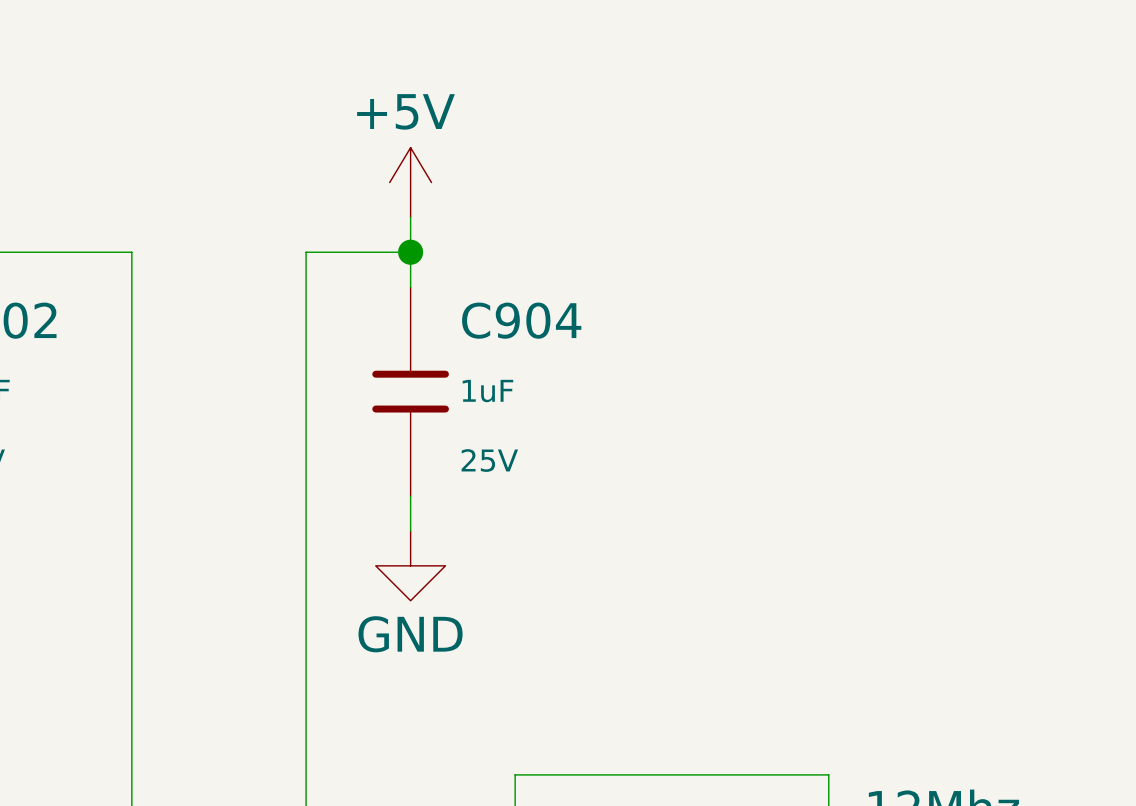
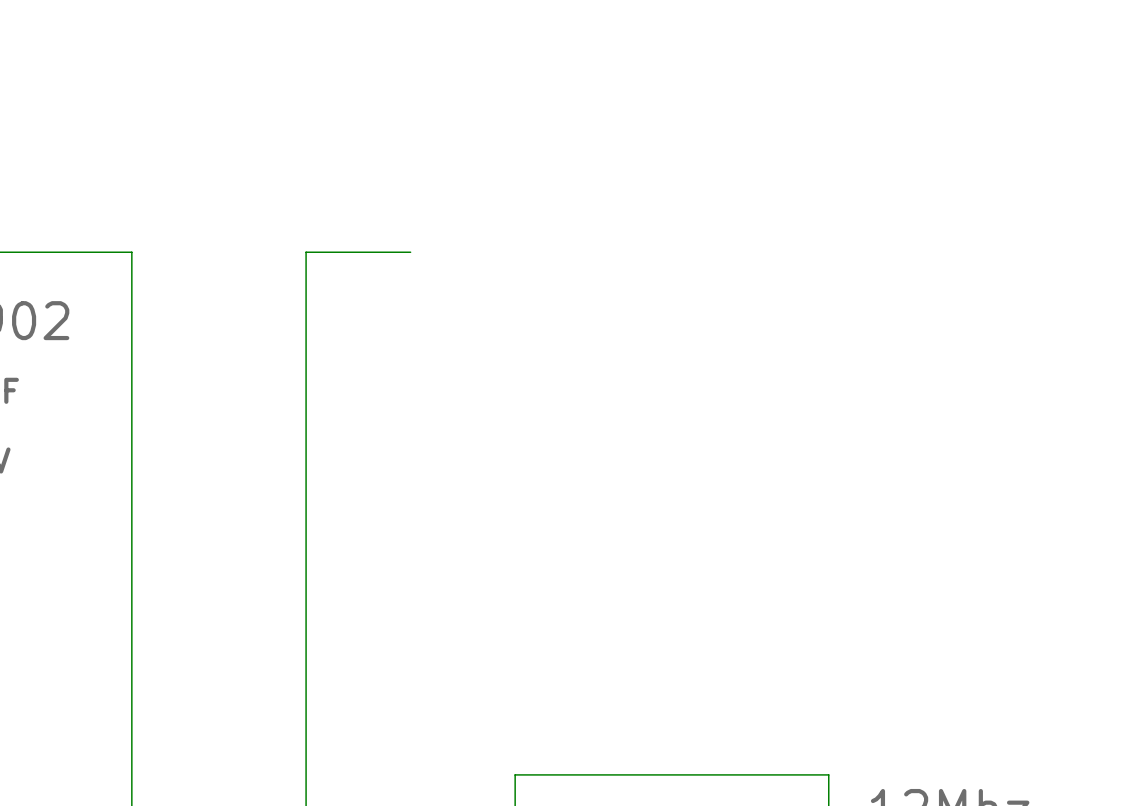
power symbol: +5V (410, 182) -> none
wire: (410, 217) (410, 287) -> none
junction: (410, 252) -> none
C904: 1uF (410, 391) -> none
wire: (410, 496) (410, 531) -> none
power symbol: GND (410, 565) -> none

